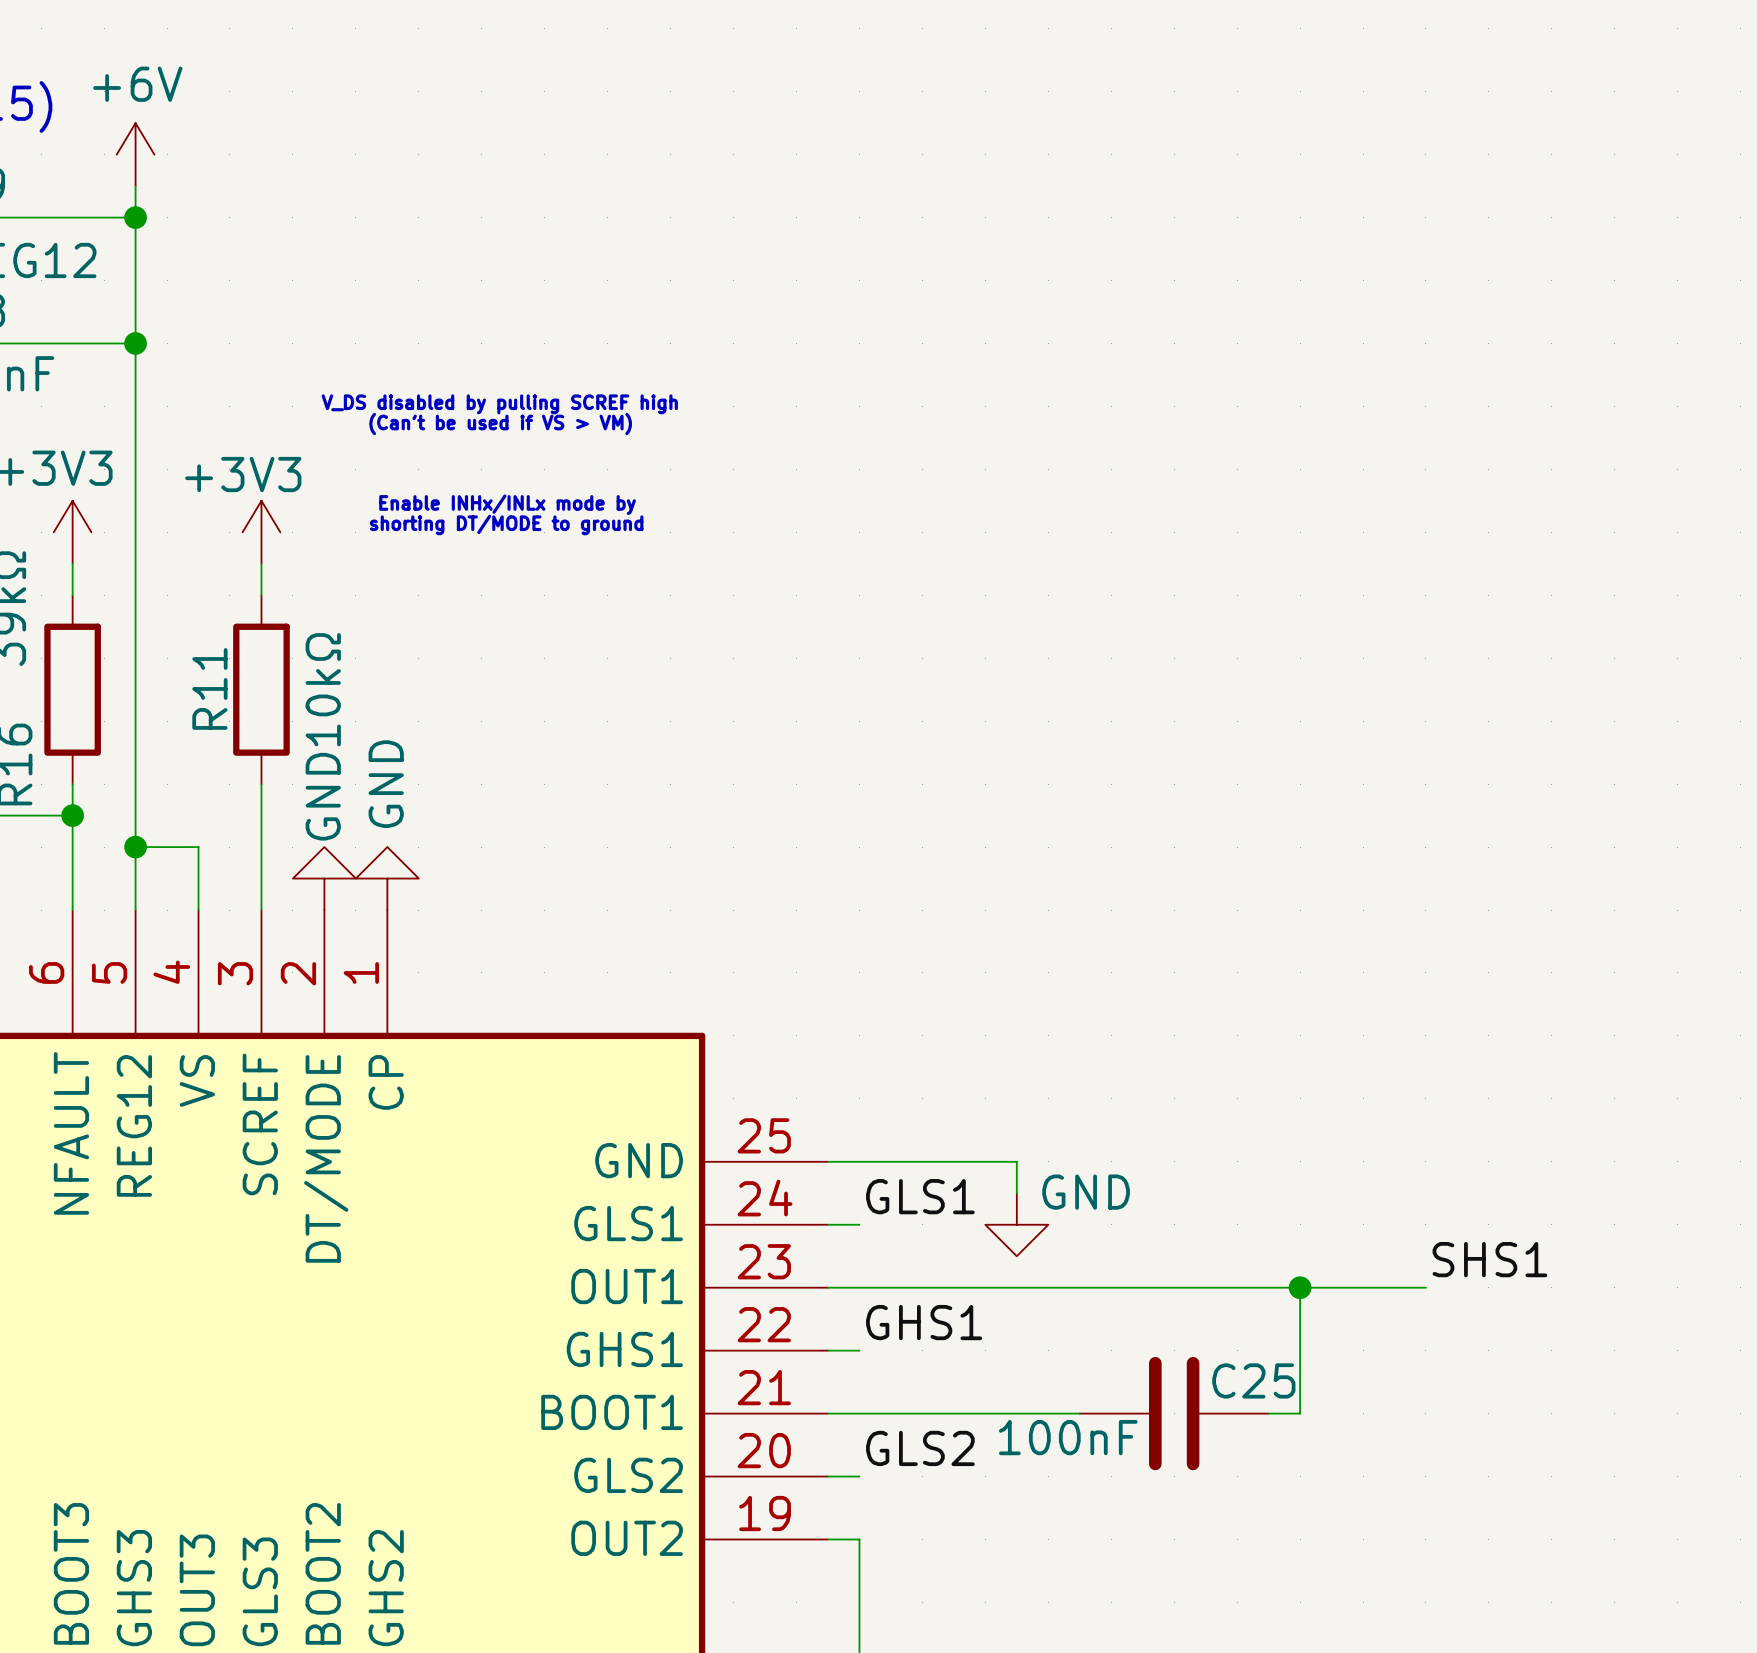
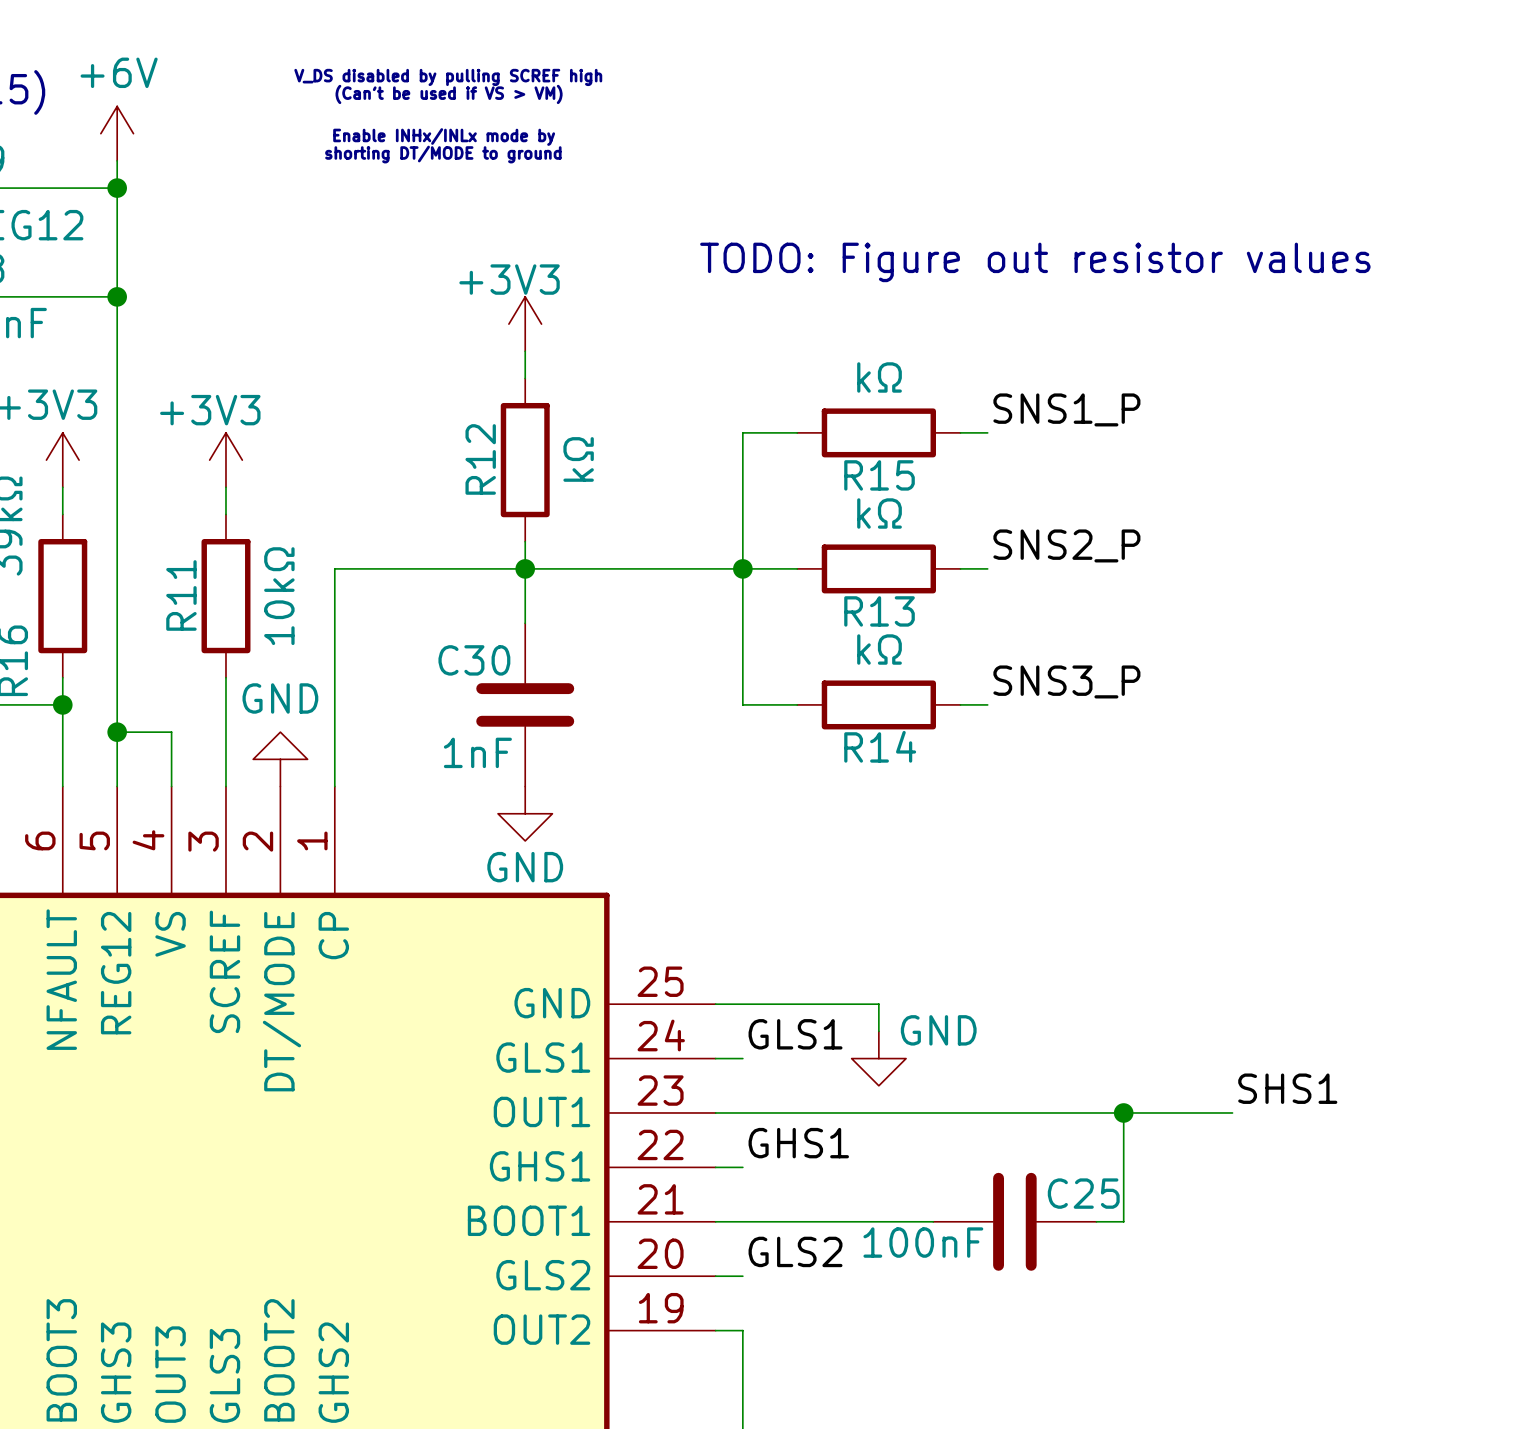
text: none -> TODO: Figure out resistor values (1035, 262)
power symbol: none -> +3V3 (525, 324)
text position: V_DS disabled by pulling SCREF high (499, 404) -> V_DS disabled by pulling SCREF high (448, 77)
wire: none -> (525, 351) (525, 378)
text position: (Can't be used if VS > VM) (500, 423) -> (Can't be used if VS > VM) (449, 94)
label: none -> SNS1_P (1066, 409)
wire: none -> (797, 432) (742, 432) (742, 704) (797, 704)
R15: none -> kΩ (878, 432)
wire: none -> (960, 432) (987, 432)
text position: Enable INHx/INLx mode by (507, 504) -> Enable INHx/INLx mode by (444, 137)
text position: shorting DT/MODE to ground (506, 525) -> shorting DT/MODE to ground (443, 154)
R12: none -> kΩ (525, 460)
wire: none -> (525, 541) (525, 623)
label: none -> SNS2_P (1066, 545)
junction: none -> (525, 568)
junction: none -> (742, 568)
wire: none -> (797, 568) (334, 568) (334, 786)
R13: none -> kΩ (878, 568)
wire: none -> (960, 568) (987, 568)
label: none -> SNS3_P (1066, 681)
power symbol text rotation: 0° (323, 796) -> 90° clockwise (280, 698)
C30: none -> 1nF (525, 704)
R14: none -> kΩ (878, 704)
wire: none -> (960, 704) (987, 704)
power symbol rotation: 0° (387, 878) -> 180° (525, 813)
power symbol position: GND (387, 878) -> GND (525, 813)

